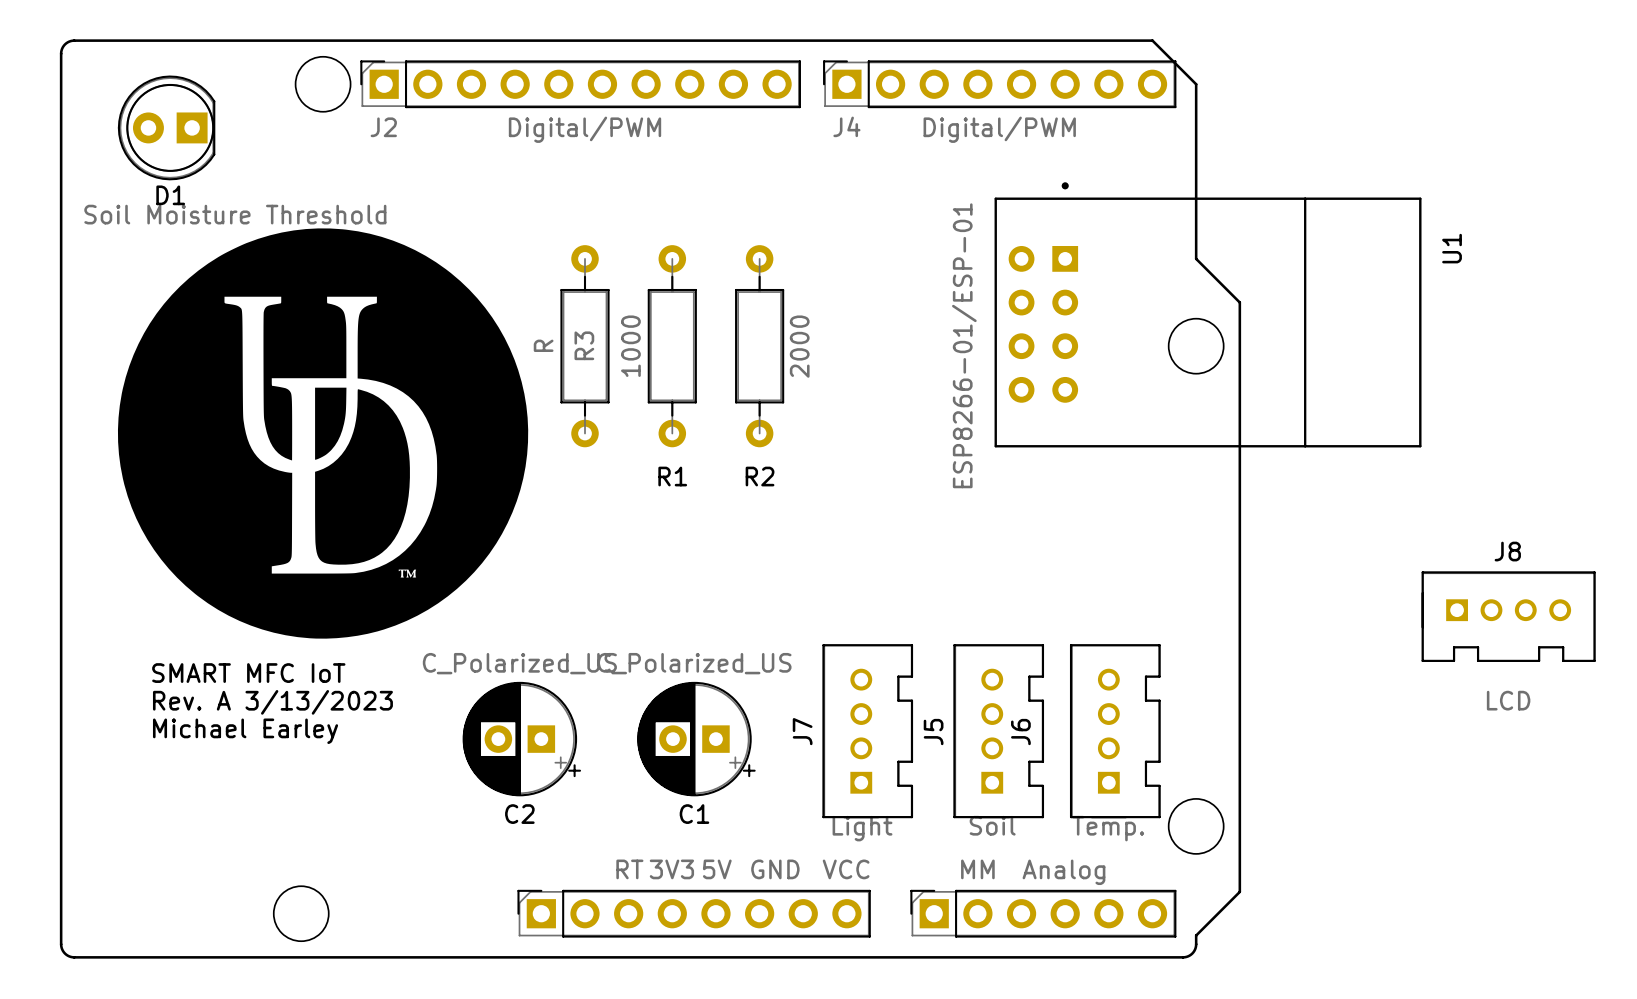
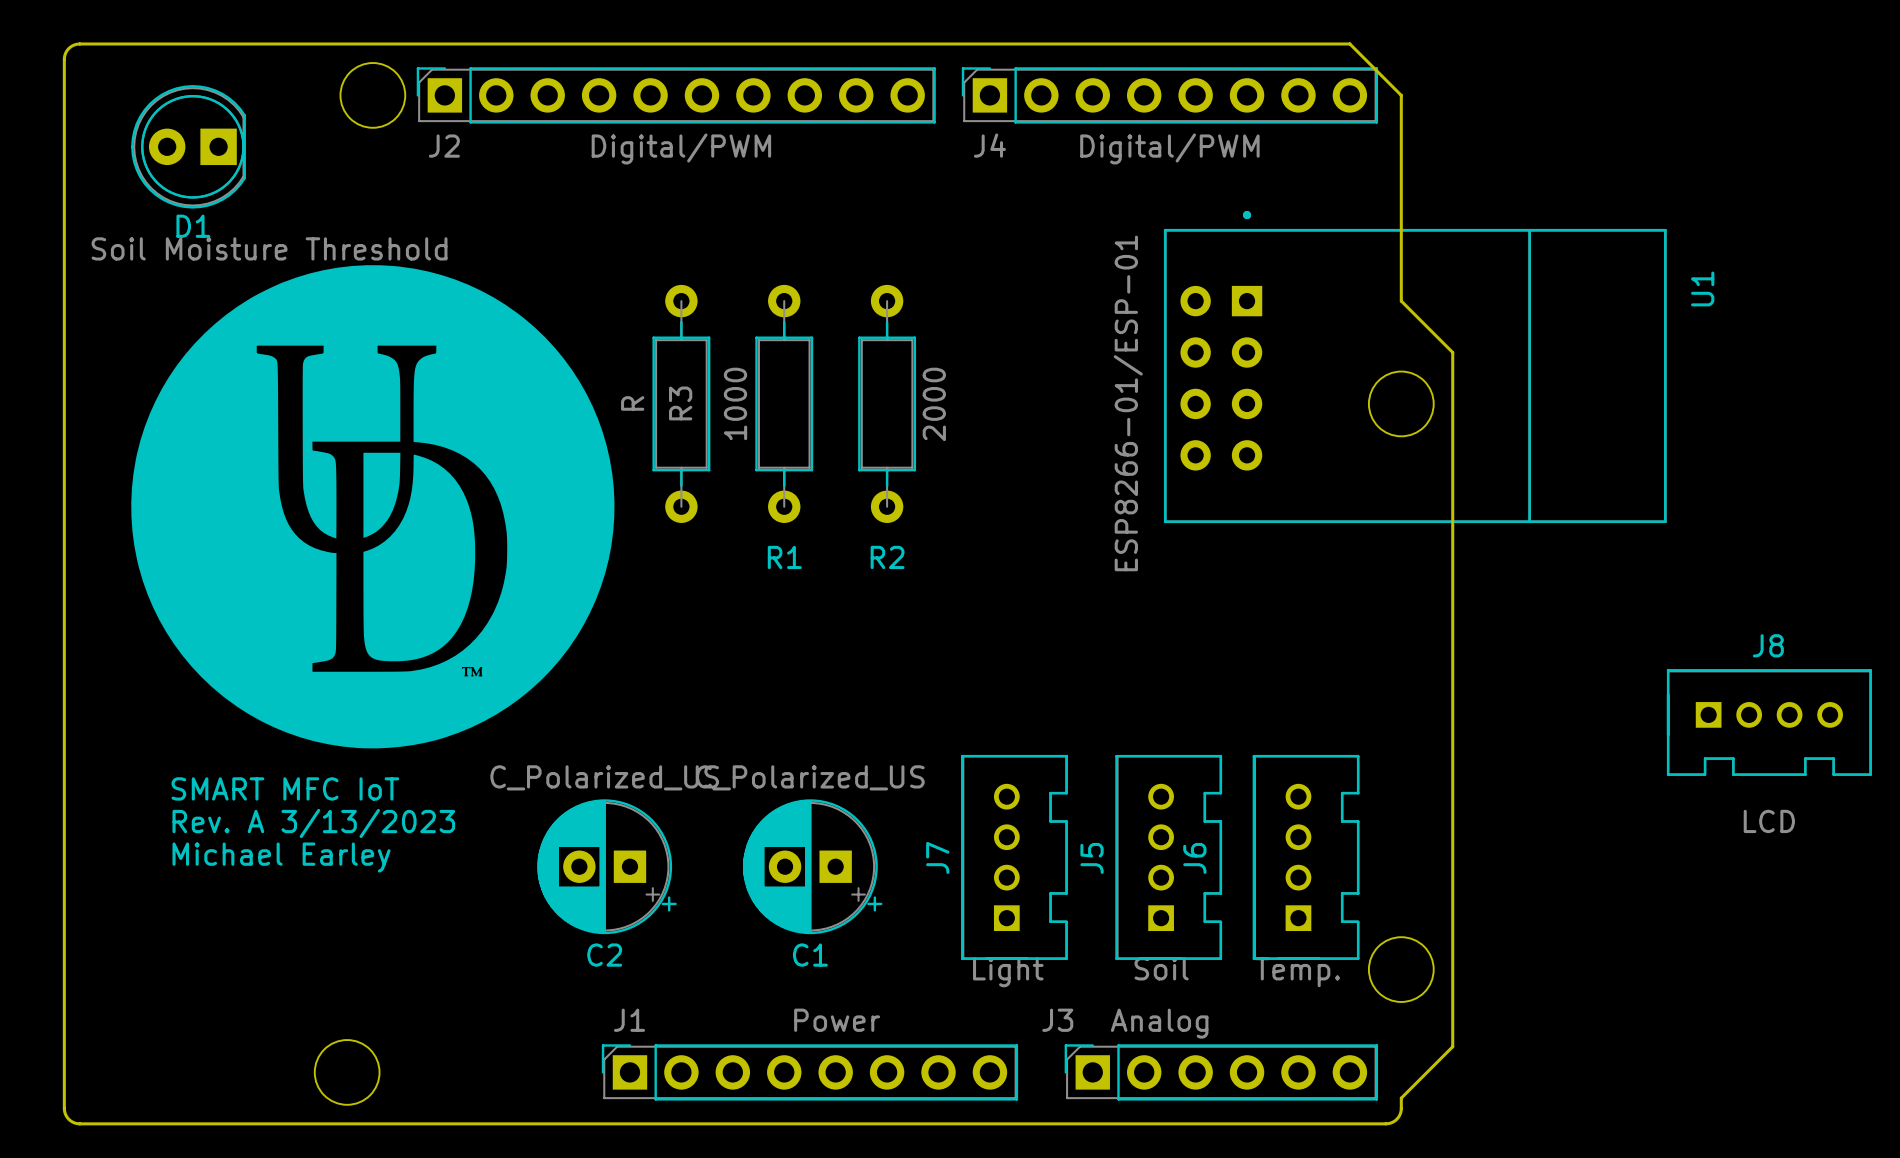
J1 name: none -> J1 (629, 1020)
text: RT (629, 869) -> none
text: 3V3 (671, 869) -> none
J1 value: none -> Power (837, 1020)
text: 5V (717, 869) -> none
text: GND (775, 869) -> none
text: VCC (846, 869) -> none
J3 name: none -> J3 (1057, 1020)
text: MM (977, 869) -> none
J3 value position: Analog (1063, 872) -> Analog (1159, 1023)

